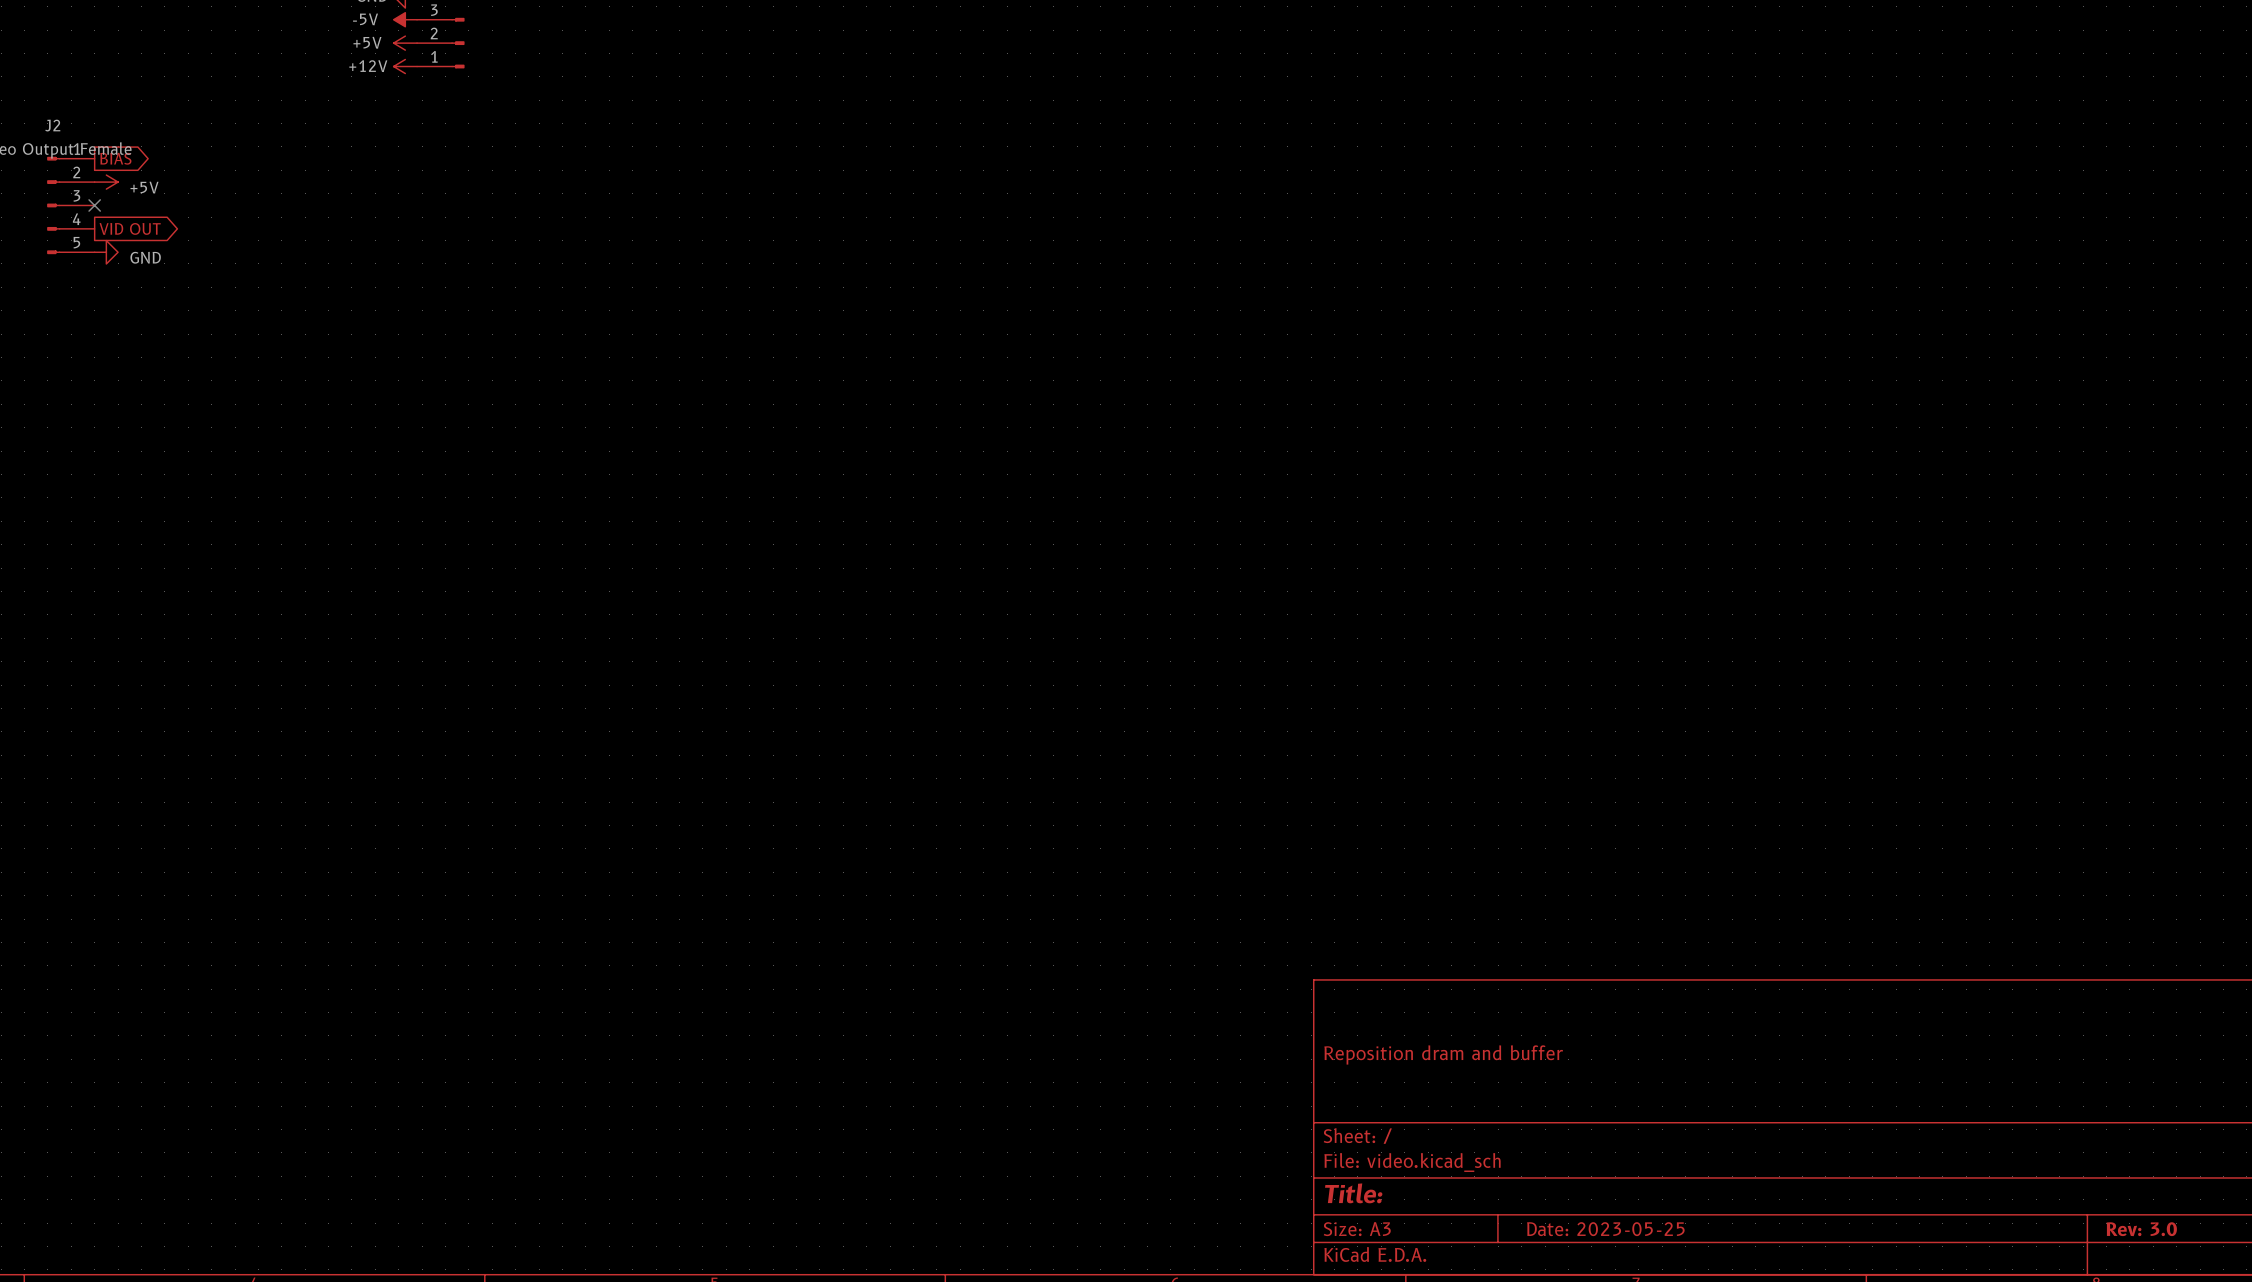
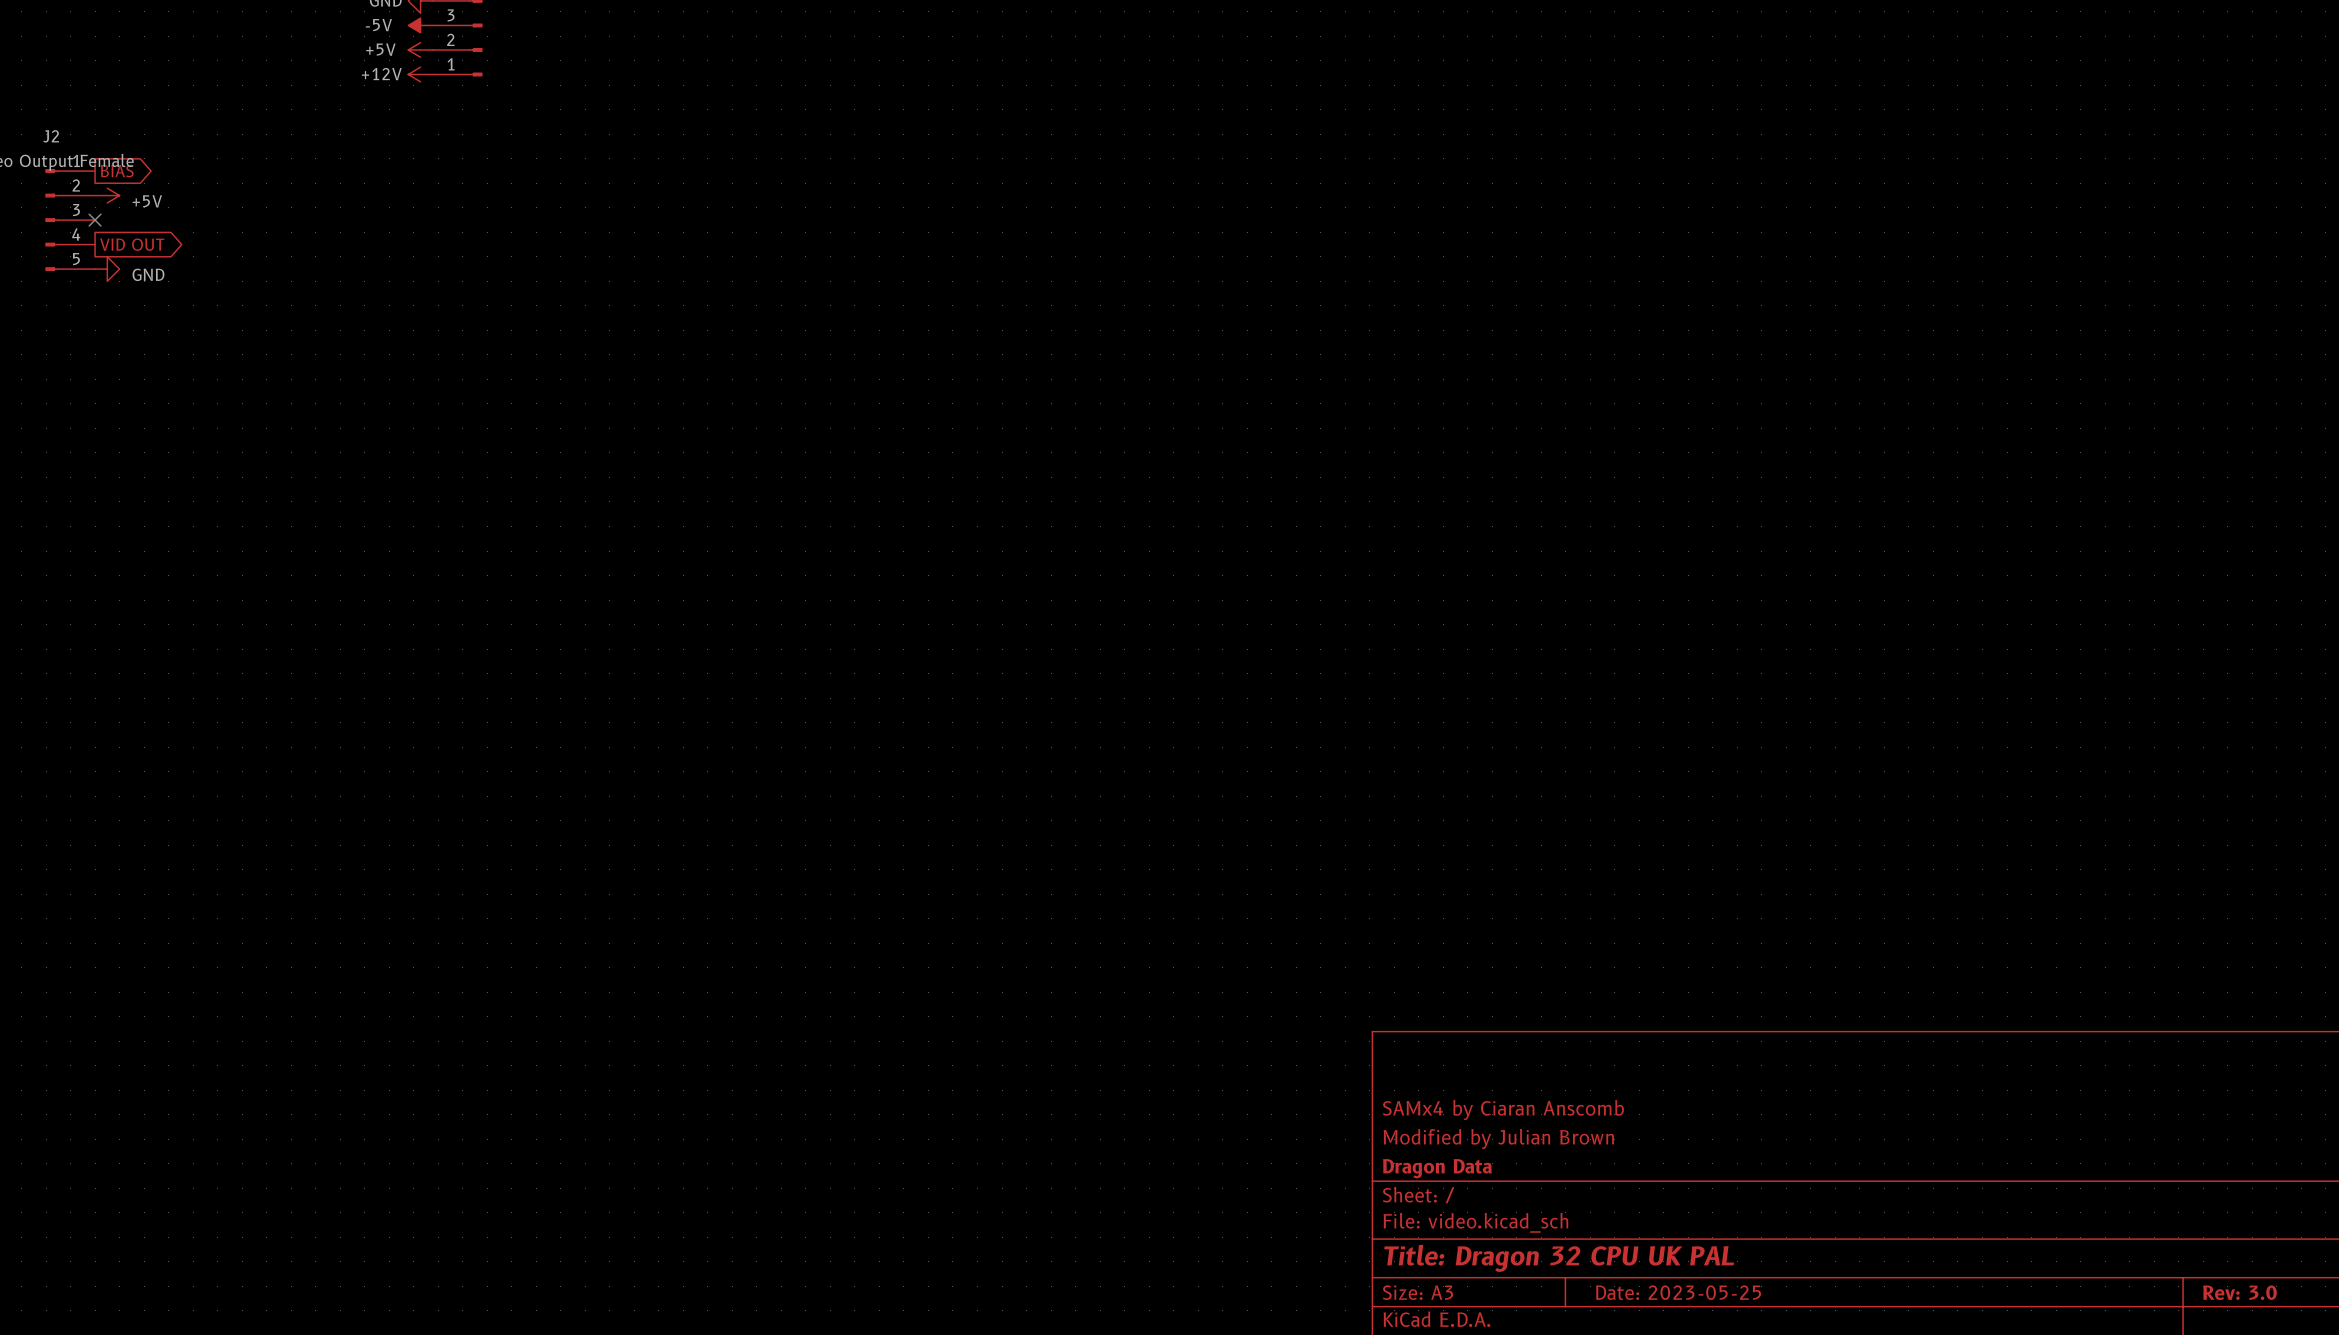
title block: Reposition dram and buffer (1443, 1054) -> SAMx4 by Ciaran Anscomb (1503, 1110)
title block: none -> Modified by Julian Brown (1498, 1139)
title block: none -> Dragon Data (1437, 1168)
title block: Title: (1353, 1193) -> Title: Dragon 32 CPU UK PAL (1559, 1258)

